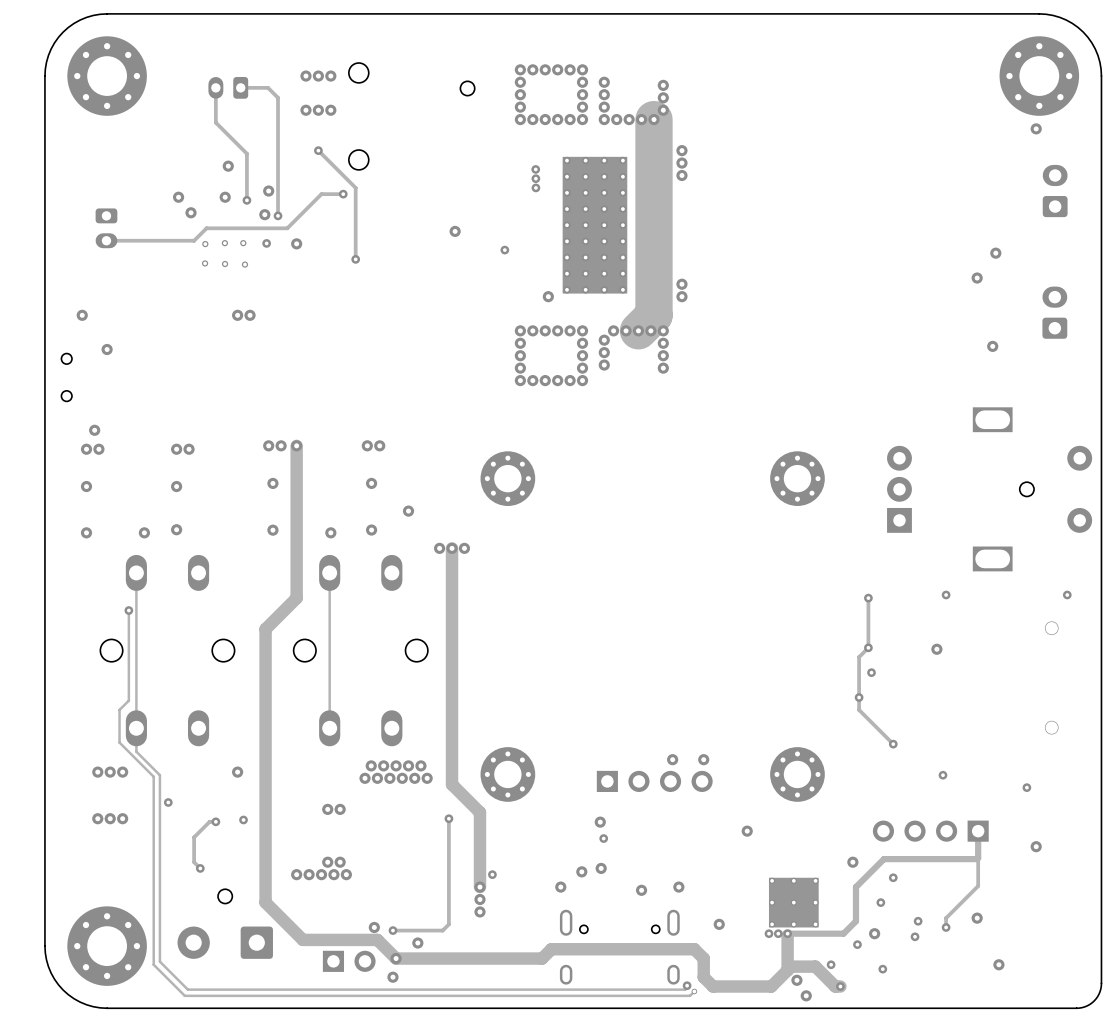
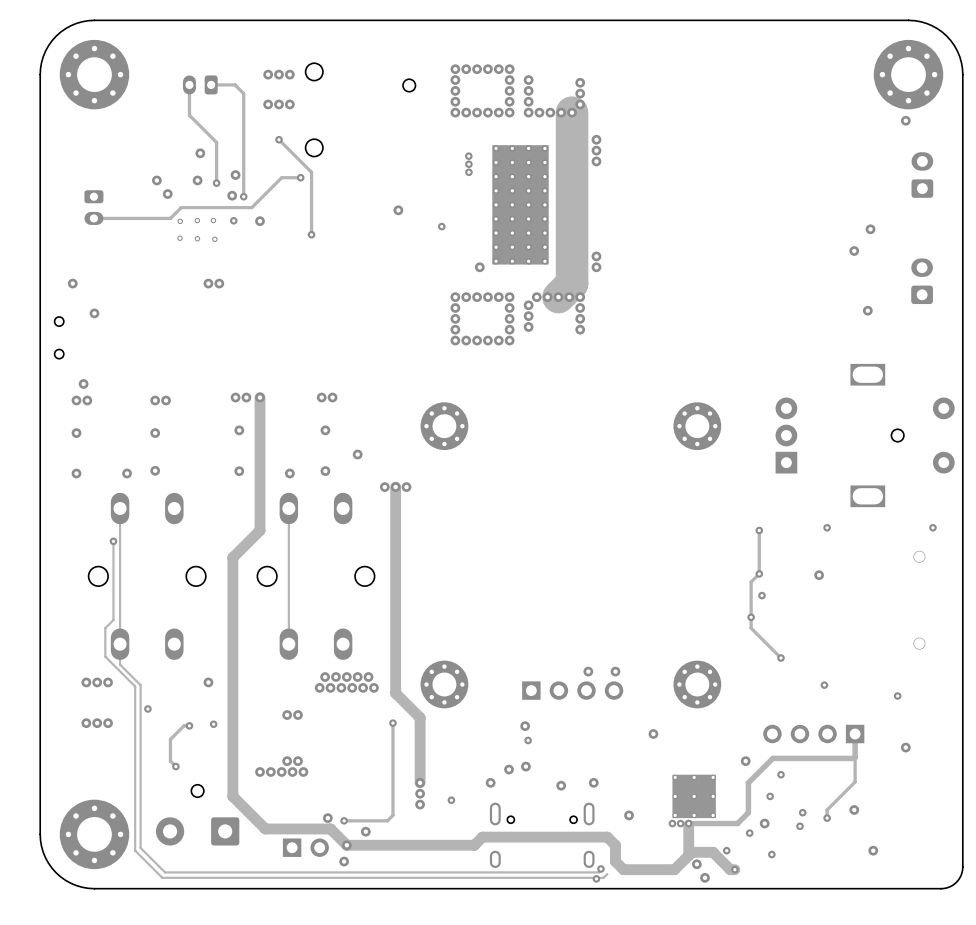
via position: (492, 874) -> (451, 800)
via: (694, 991) -> none
via: none -> (596, 878)

